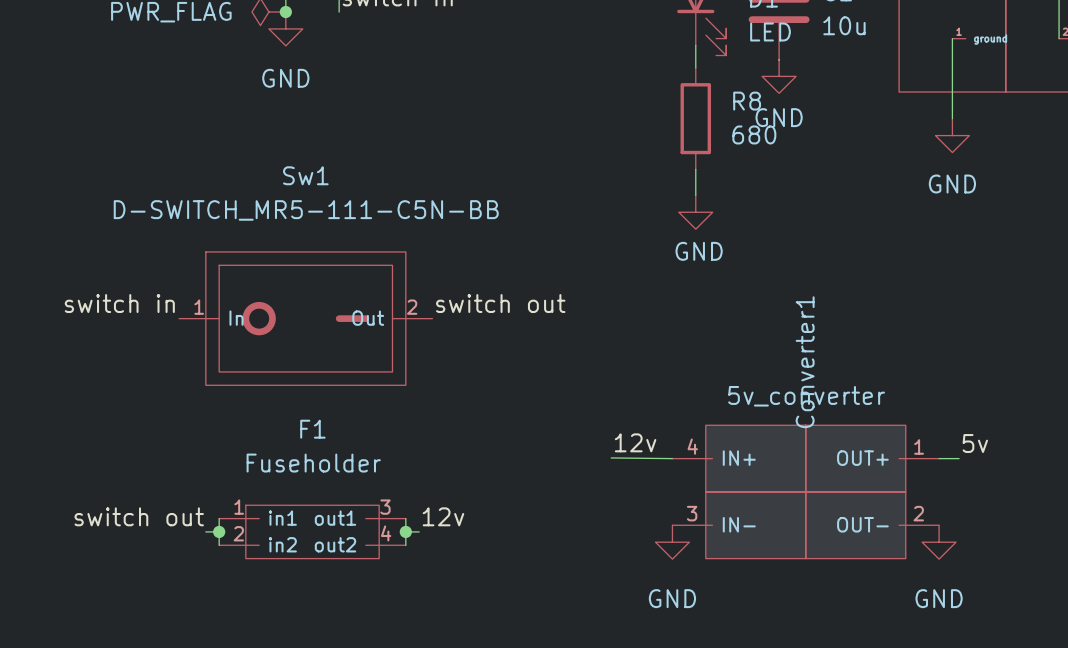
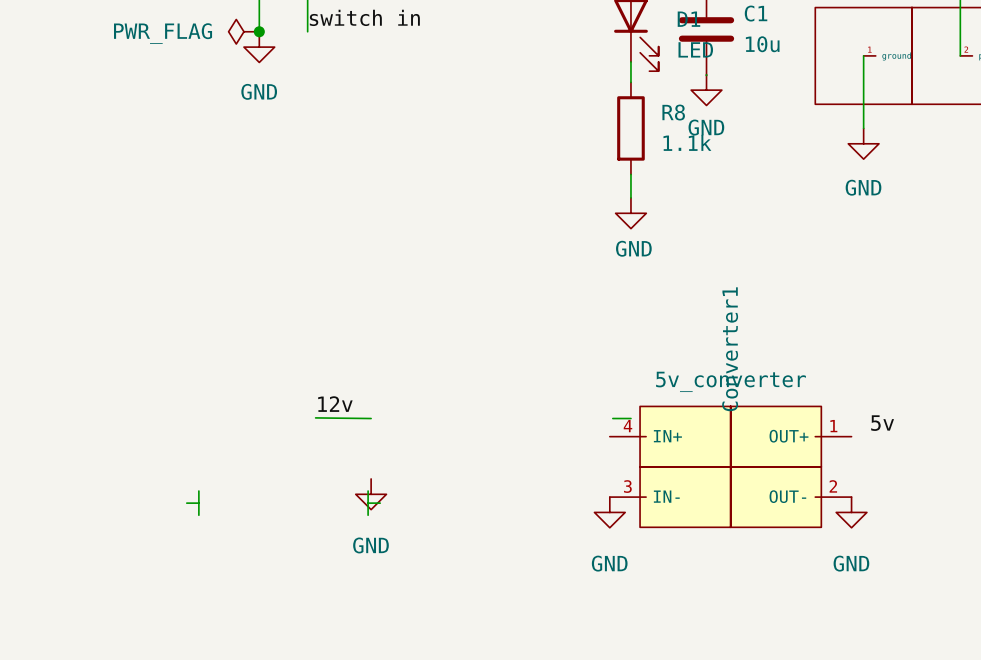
R8 value: 680 (754, 134) -> 1.1k (687, 142)
label: switch in (119, 303) -> none
label: switch out (500, 303) -> none
Sw1: D-SWITCH_MR5-111-C5N-BB (305, 318) -> none
label: 12v (635, 442) -> none
wire: (611, 457) (672, 458) -> (315, 417) (371, 418)
wire: (939, 458) (959, 458) -> (612, 418) (630, 418)
label: switch out (139, 516) -> none
label position: 12v (443, 516) -> 12v (335, 404)
power symbol: none -> GND (371, 494)
junction: (219, 531) -> none
F1: Fuseholder (312, 531) -> none
junction: (405, 531) -> none

